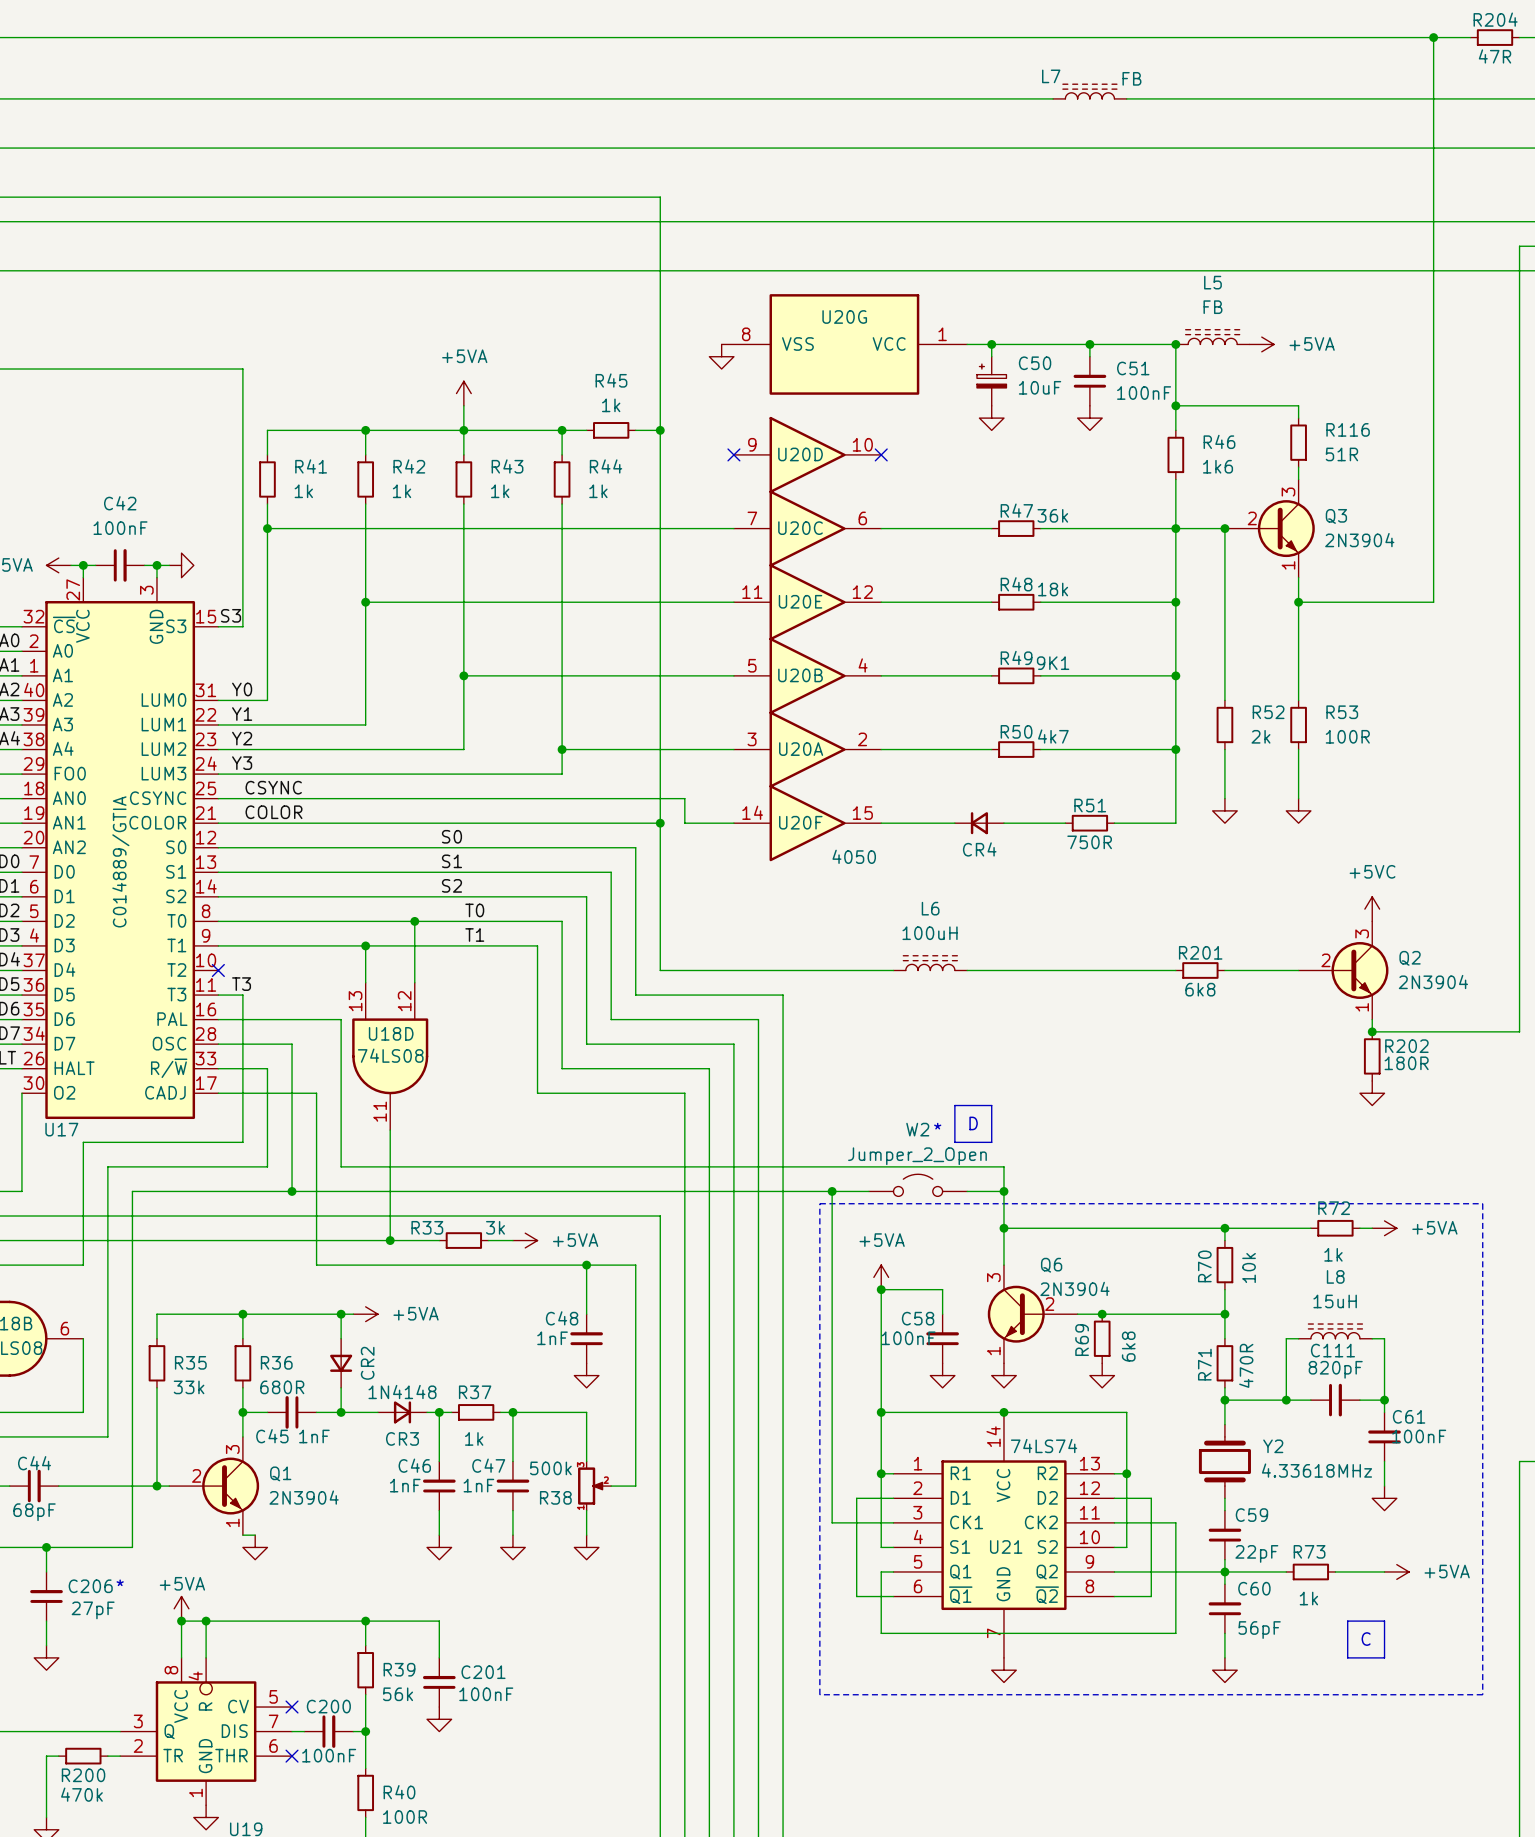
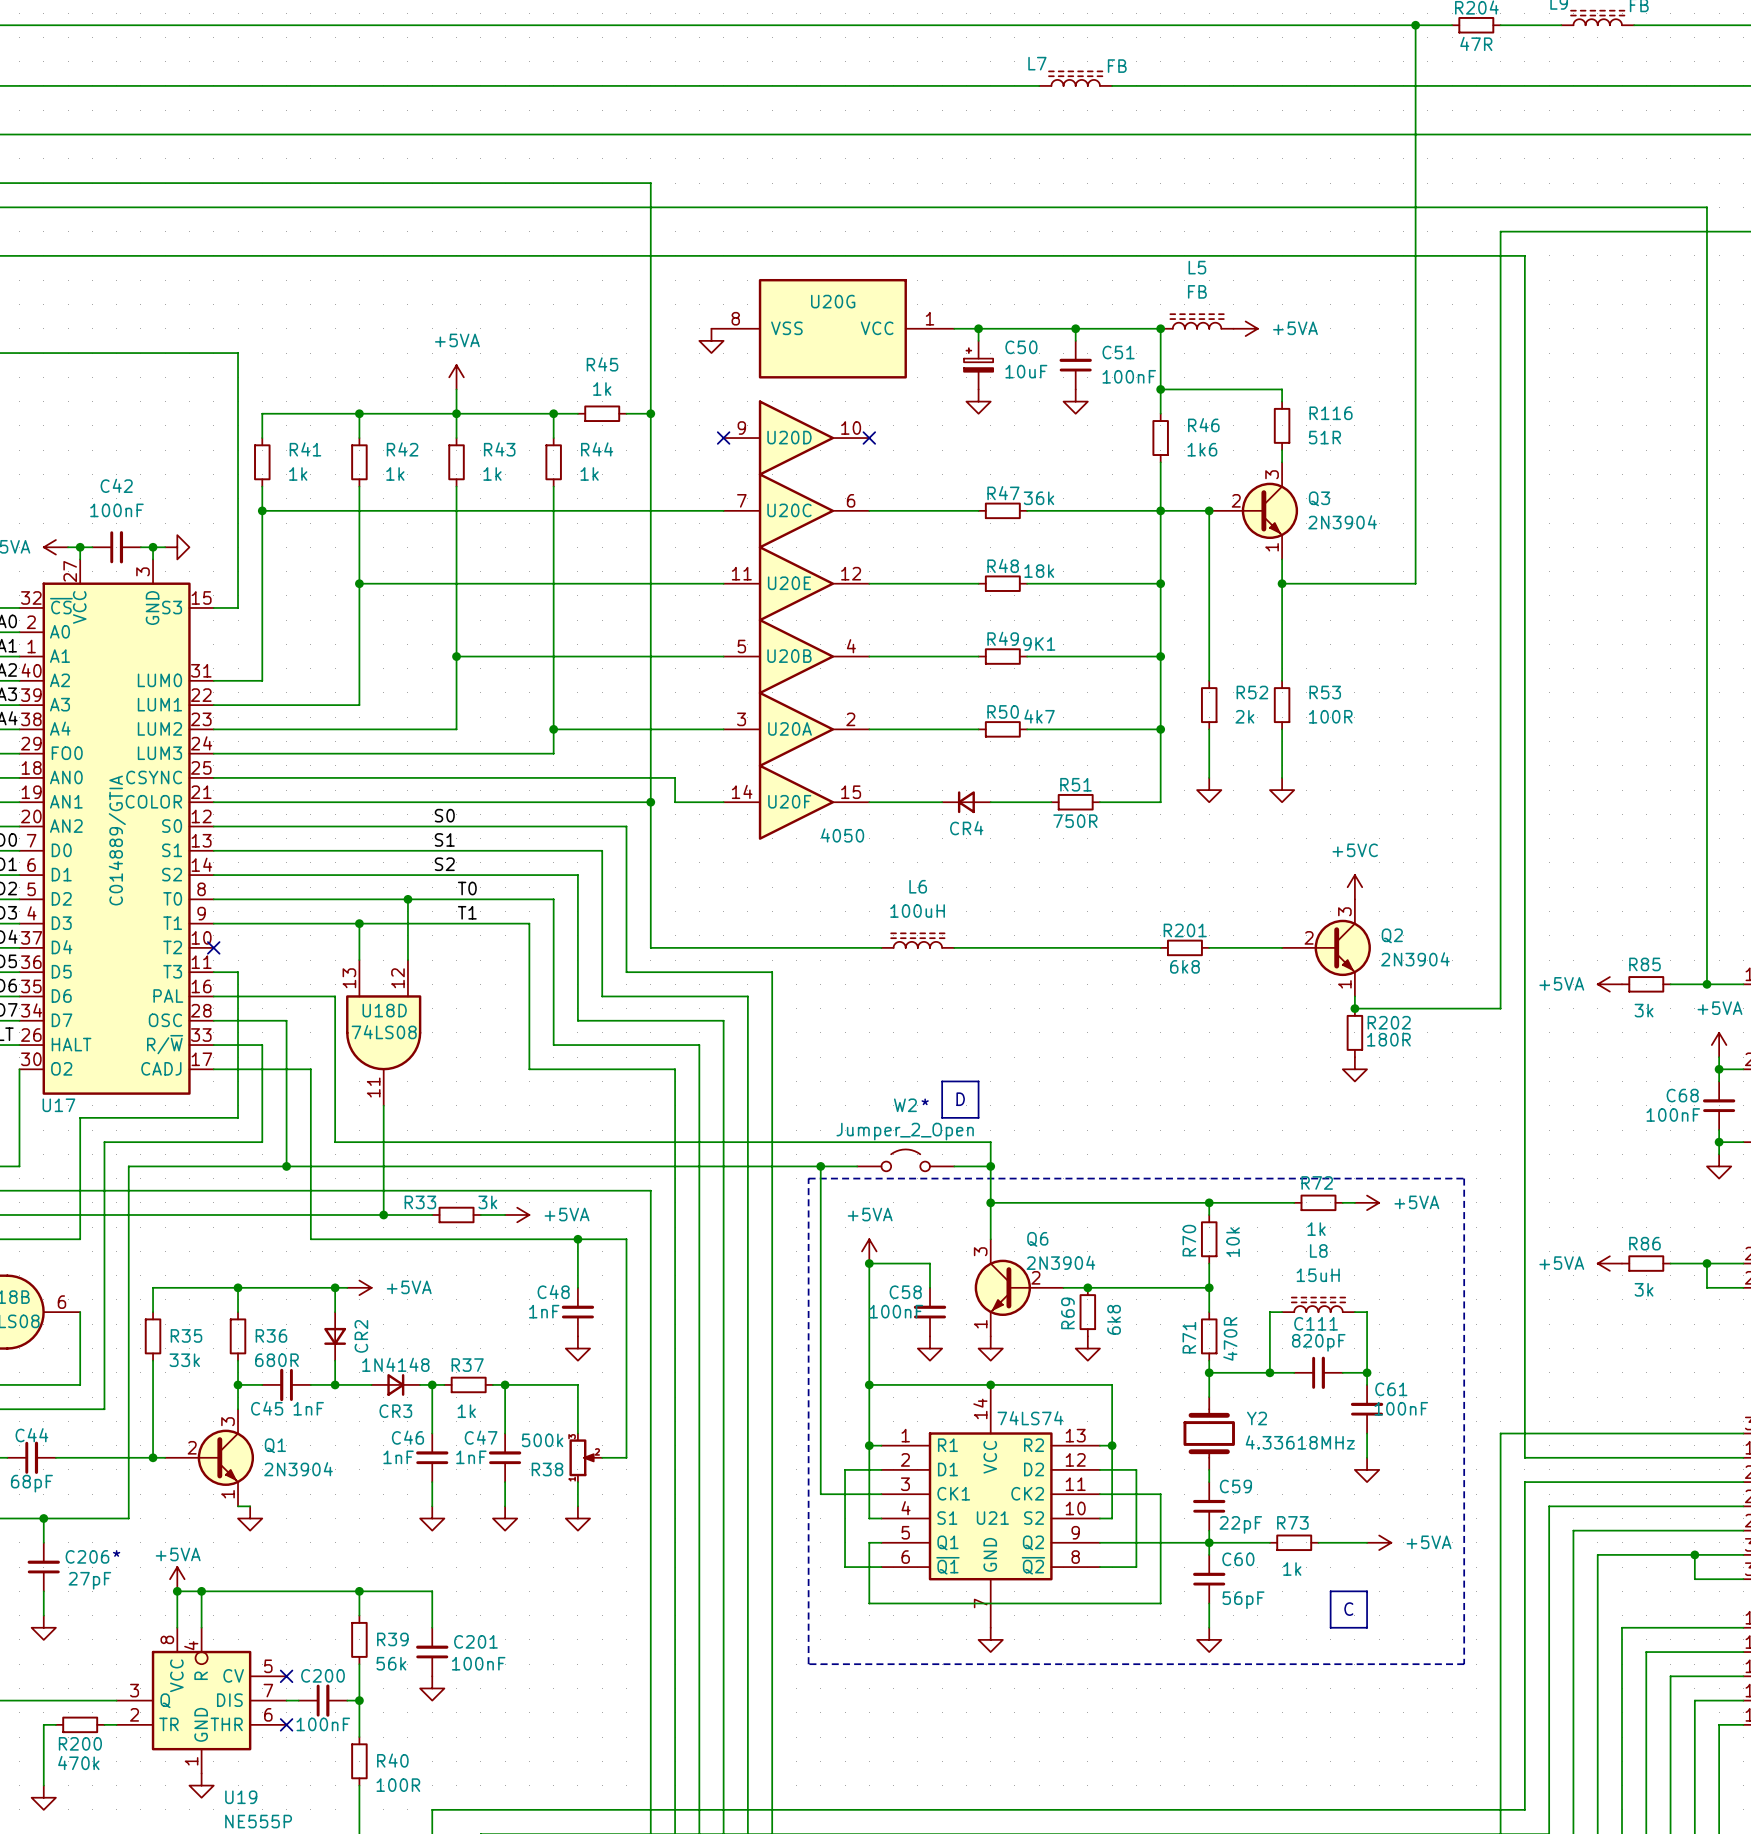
label: S3 (231, 615) -> none
label: Y0 (242, 689) -> none
label: Y1 (242, 714) -> none
label: Y2 (242, 738) -> none
label: Y3 (242, 763) -> none
label: CSYNC (273, 787) -> none
label: COLOR (273, 812) -> none
label: T3 (241, 984) -> none

